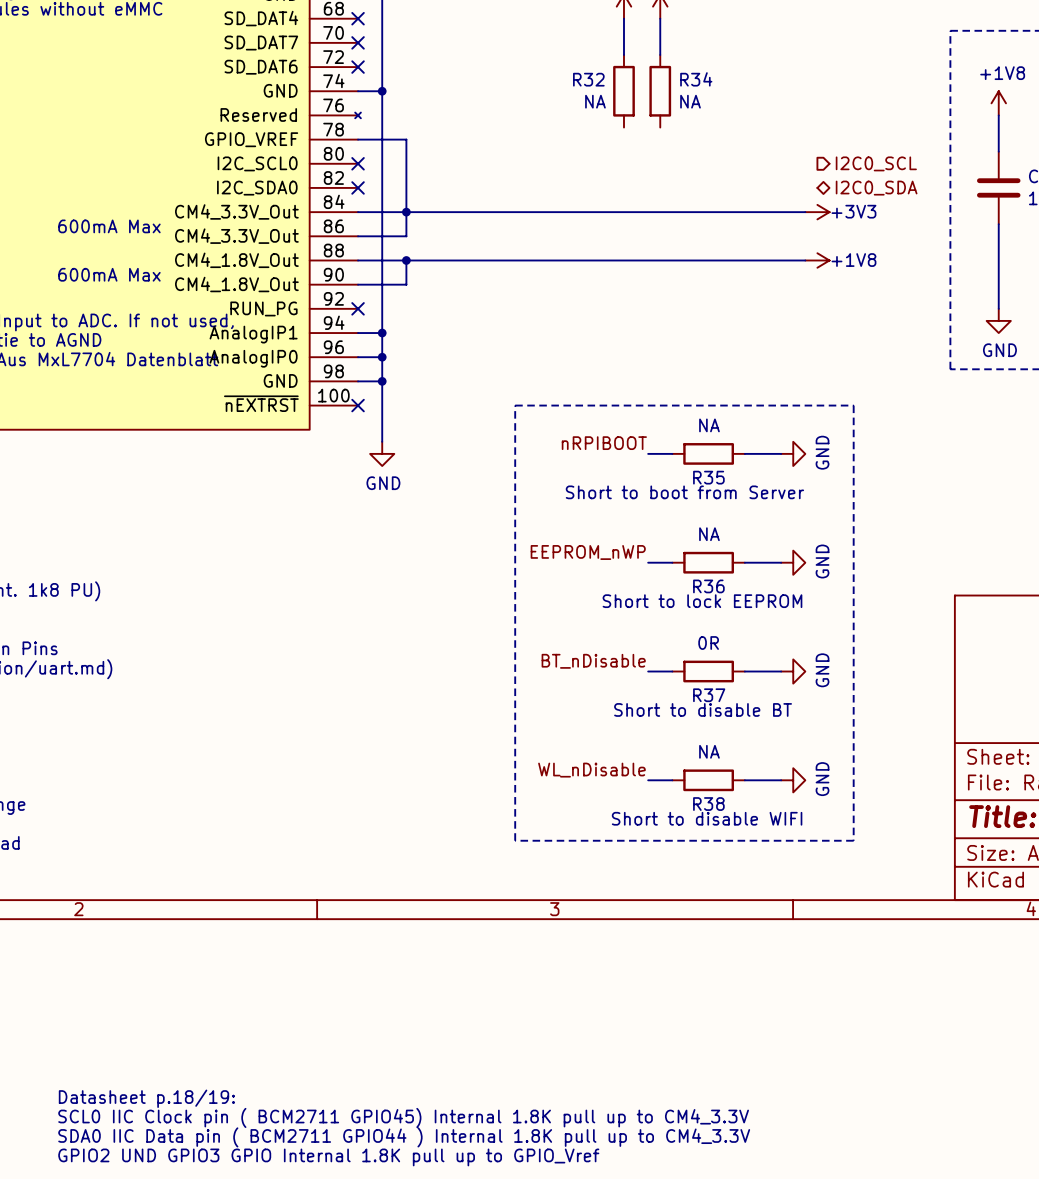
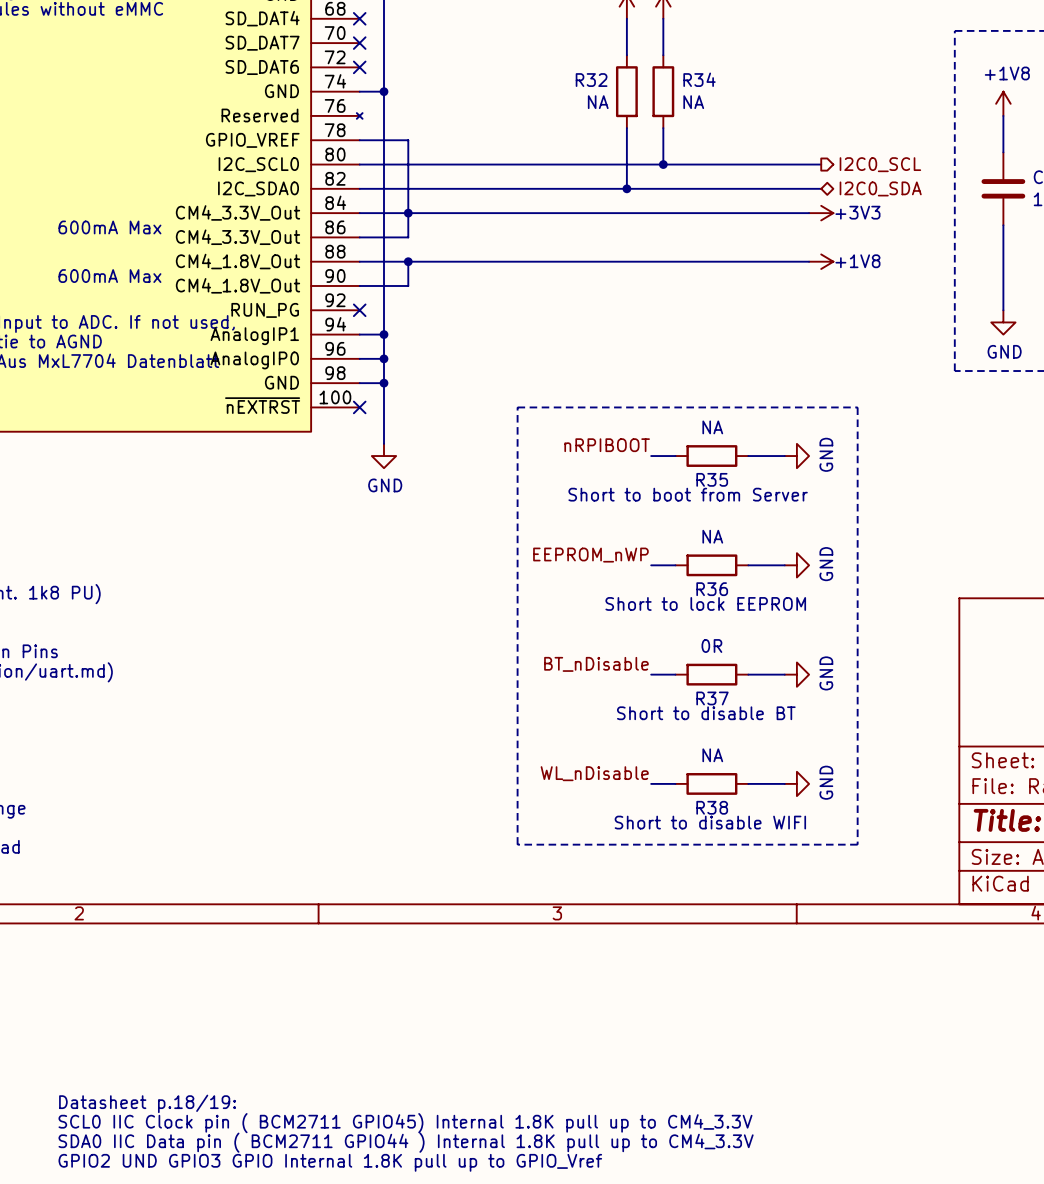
wire: none -> (626, 128) (626, 188)
wire: none -> (663, 128) (663, 164)
wire: none -> (359, 164) (821, 164)
no-connect mark: (358, 163) -> none
junction: none -> (663, 164)
wire: none -> (359, 188) (821, 188)
no-connect mark: (358, 187) -> none
junction: none -> (626, 188)

